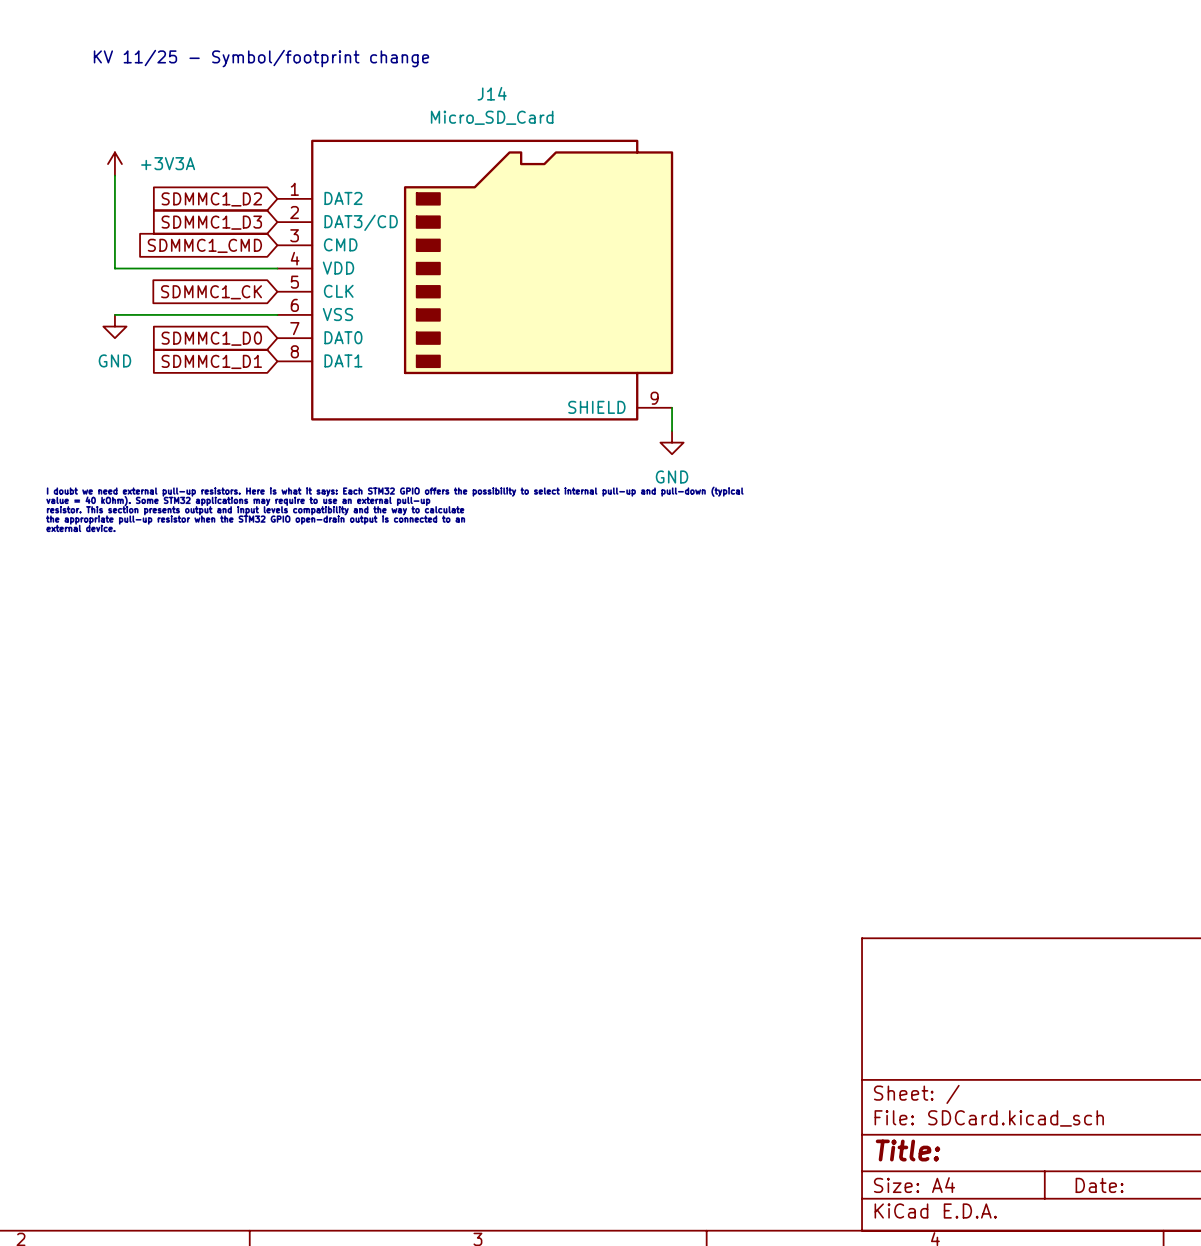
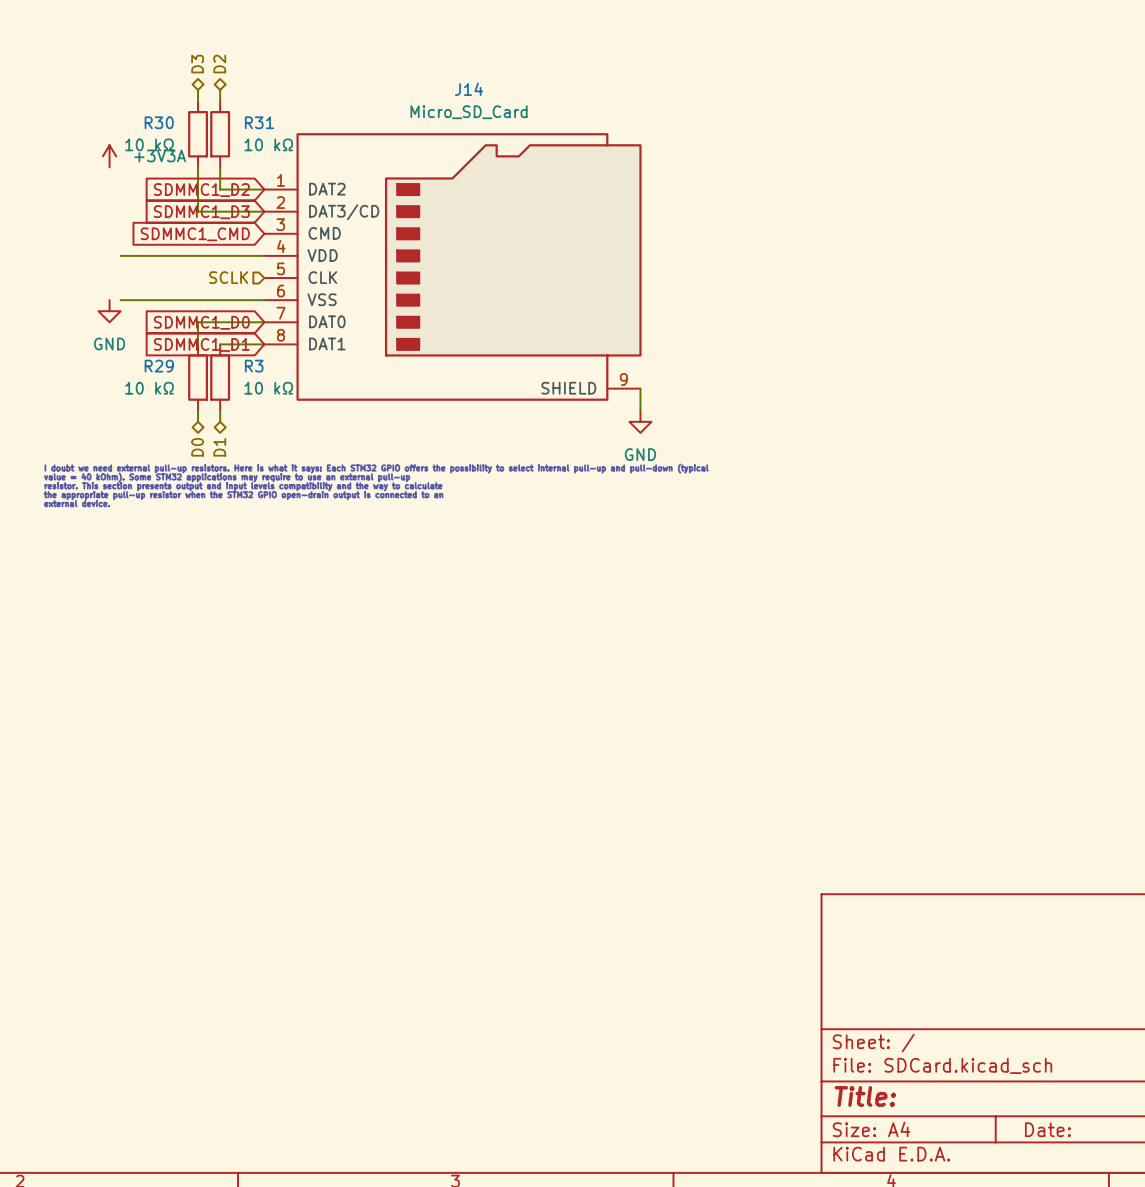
text: KV 11/25 - Symbol/footprint change (261, 58) -> none
hierarchical label: none -> D3 (197, 64)
hierarchical label: none -> D2 (219, 64)
wire: none -> (198, 90) (198, 101)
wire: none -> (220, 90) (220, 101)
R30: none -> 10 kΩ (198, 134)
R31: none -> 10 kΩ (220, 134)
wire: (114, 175) (114, 268) (126, 268) -> none
wire: none -> (198, 167) (198, 211) (264, 211)
wire: none -> (220, 167) (220, 189) (264, 189)
hierarchical label: none -> SCLK (228, 277)
global label: SDMMC1_CK (211, 292) -> none
wire: (114, 314) (126, 314) -> none
wire: none -> (264, 322) (198, 322) (198, 344)
wire: none -> (220, 344) (264, 344)
R29: none -> 10 kΩ (198, 377)
R3: none -> 10 kΩ (220, 377)
wire: none -> (198, 410) (198, 421)
wire: none -> (220, 410) (220, 421)
hierarchical label: none -> D0 (197, 447)
hierarchical label: none -> D1 (219, 447)

